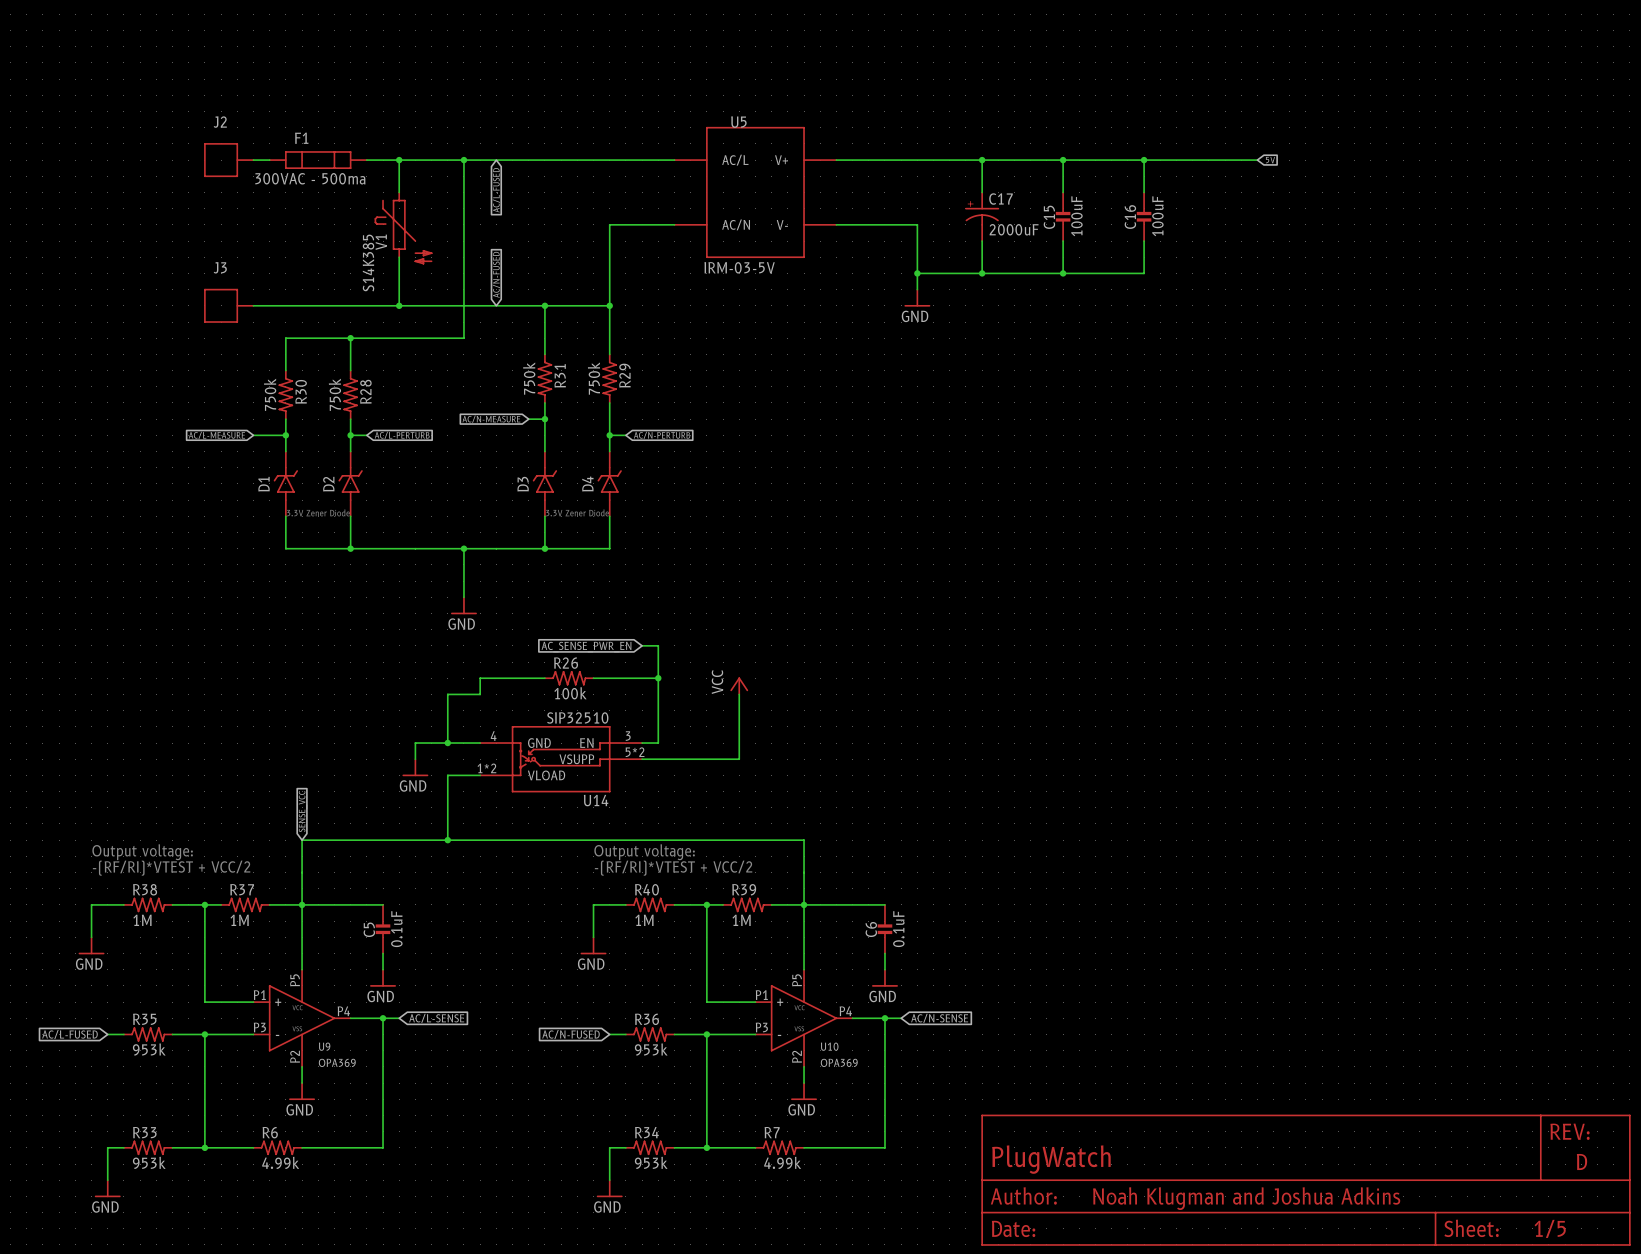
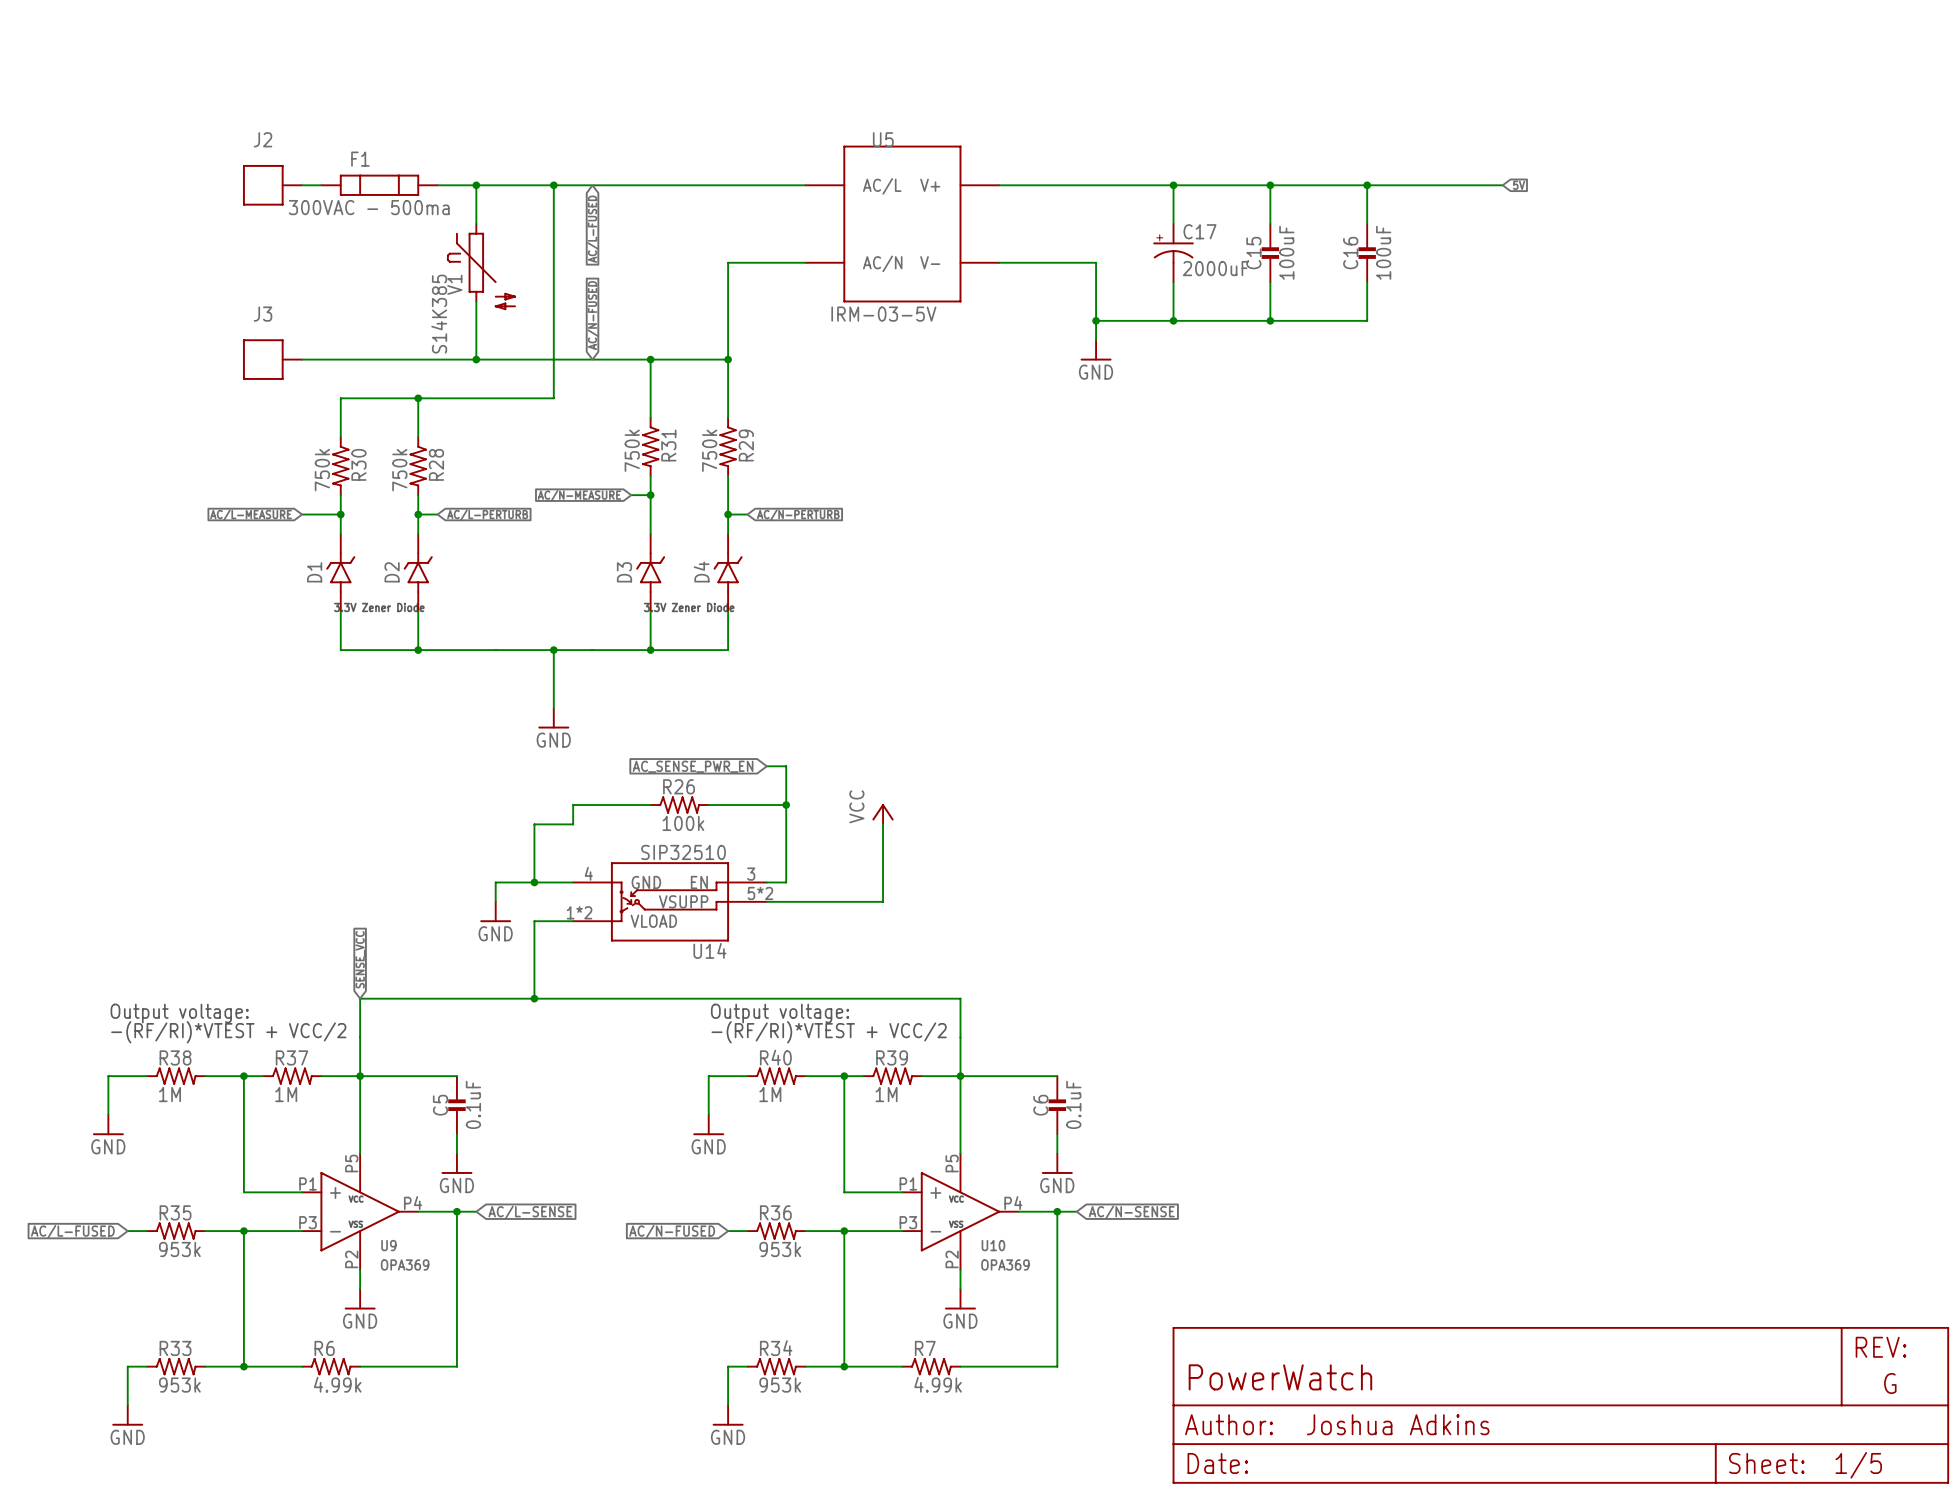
part text: PlugWatch (1051, 1159) -> PowerWatch (1280, 1377)
part text: D (1582, 1161) -> G (1890, 1383)
part text: Noah Klugman and Joshua Adkins (1246, 1198) -> Joshua Adkins (1398, 1424)

